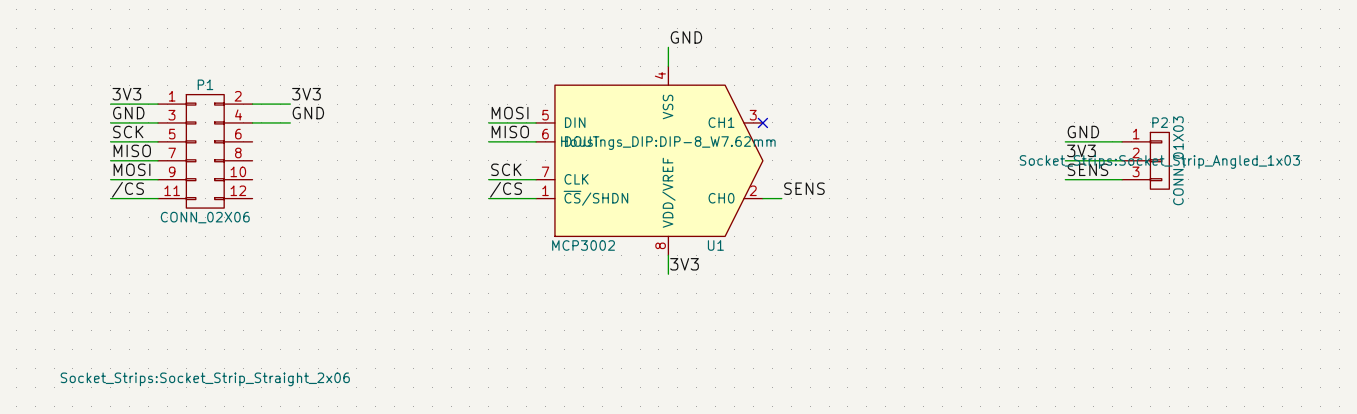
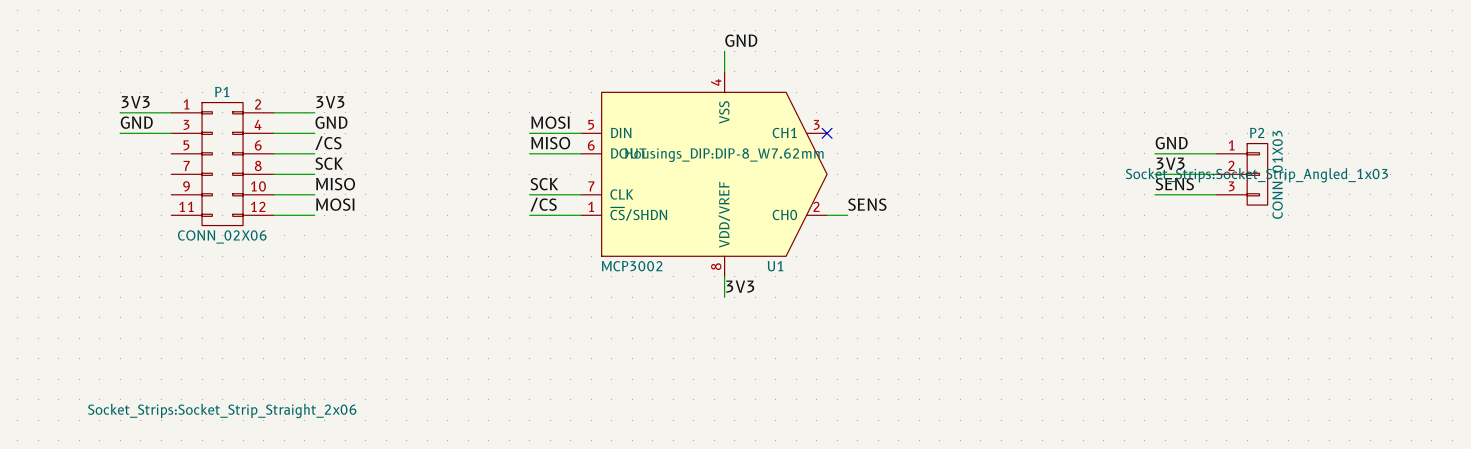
label position: SCK (128, 131) -> SCK (329, 163)
label: none -> /CS (328, 143)
wire: (110, 141) (158, 141) -> none
wire: none -> (273, 153) (314, 153)
label position: MISO (132, 150) -> MISO (335, 184)
wire: (110, 160) (158, 160) -> none
wire: none -> (273, 174) (314, 174)
label position: MOSI (132, 169) -> MOSI (335, 204)
wire: (110, 179) (158, 179) -> none
wire: none -> (273, 194) (314, 194)
label: /CS (127, 189) -> none
wire: (110, 198) (158, 198) -> none
wire: none -> (273, 215) (314, 215)

